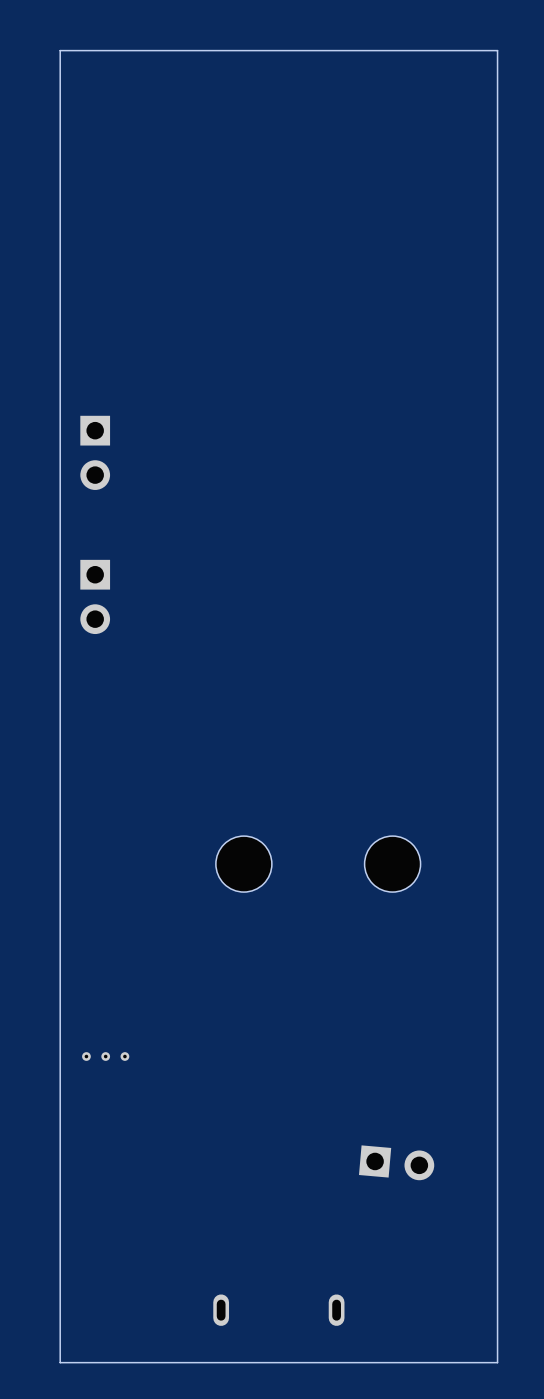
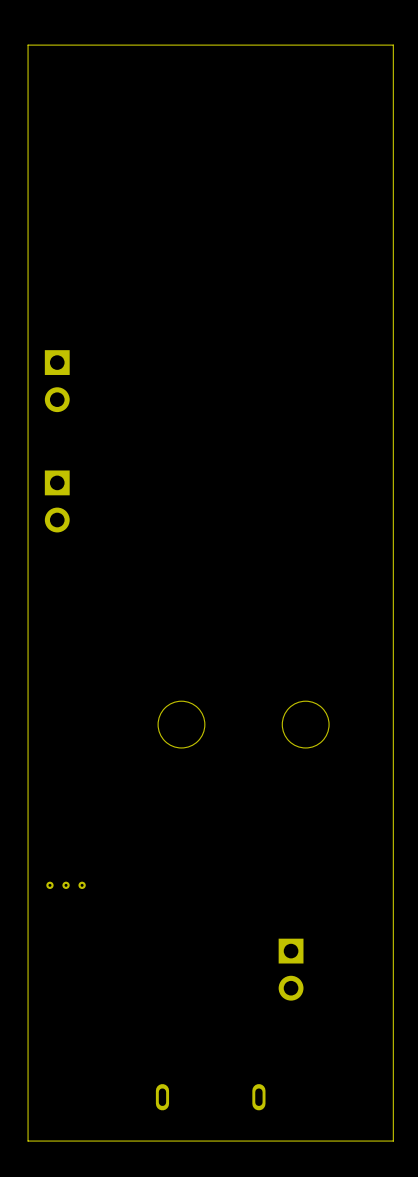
part: none -> (291, 969)
part: (396, 1162) -> none

